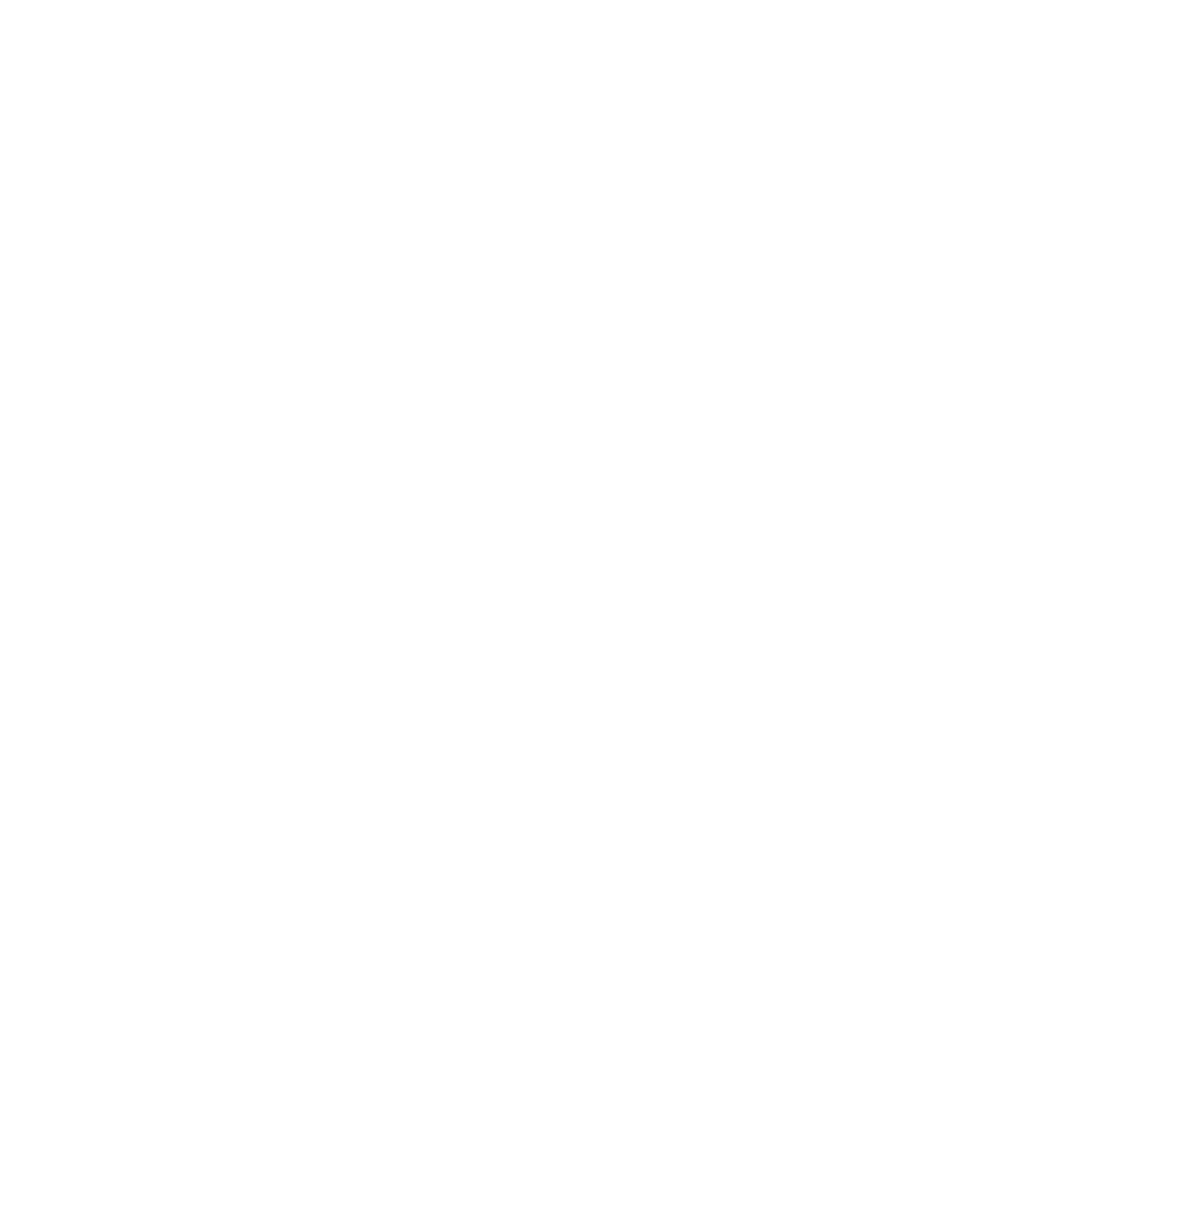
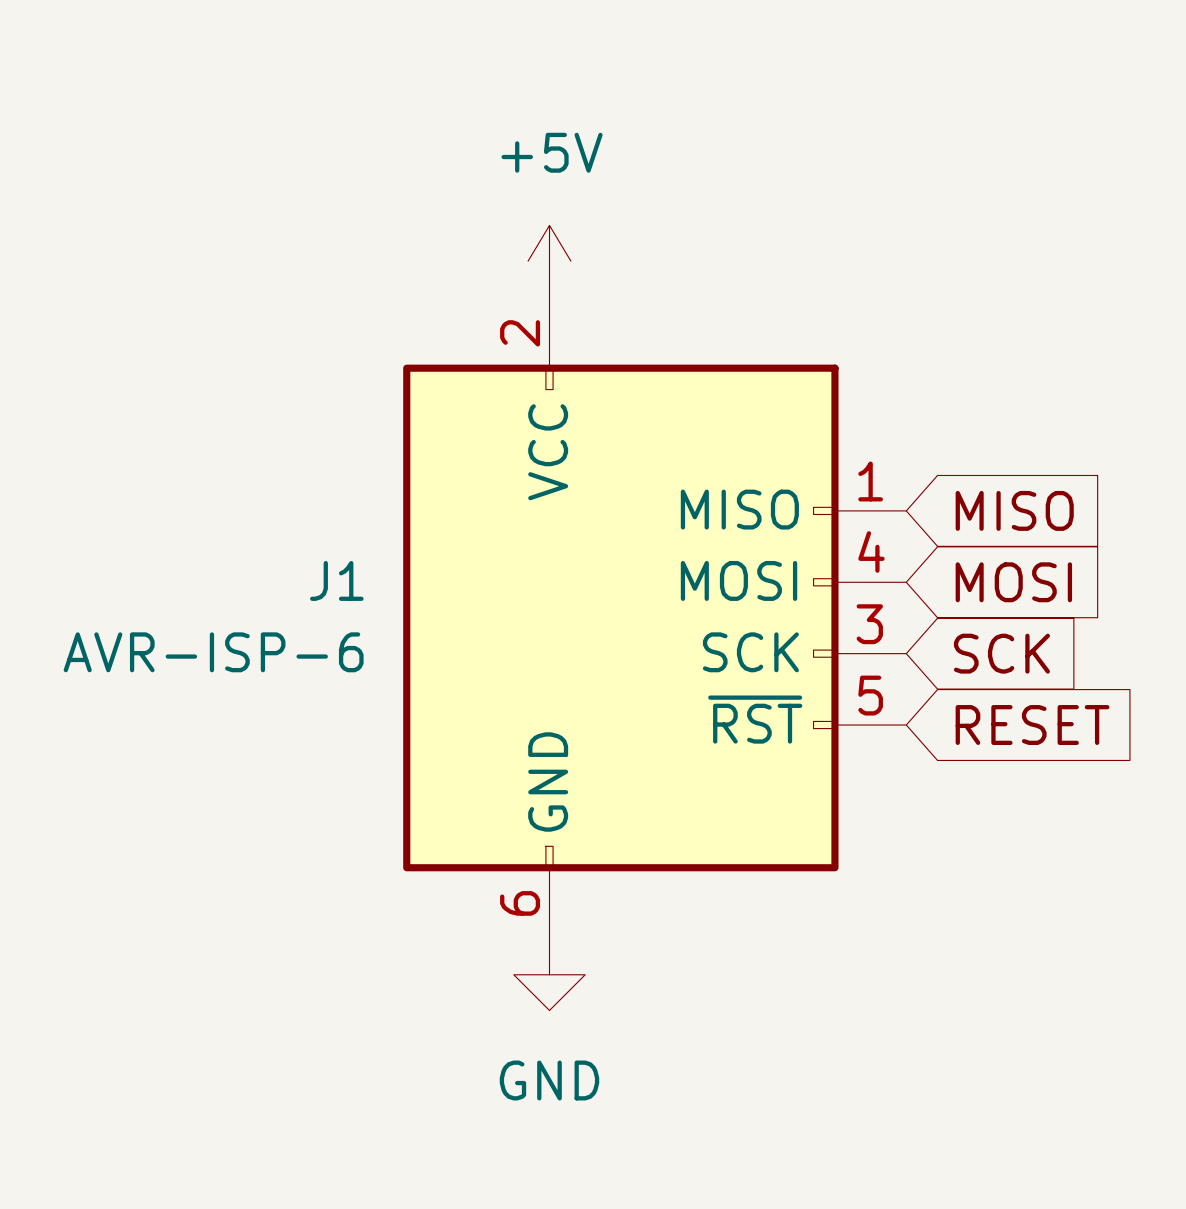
power symbol: none -> +5V (549, 261)
global label: none -> MISO (1014, 510)
global label: none -> MOSI (1013, 582)
J1: none -> AVR-ISP-6 (654, 617)
global label: none -> SCK (1001, 653)
global label: none -> RESET (1032, 725)
power symbol: none -> GND (549, 974)

